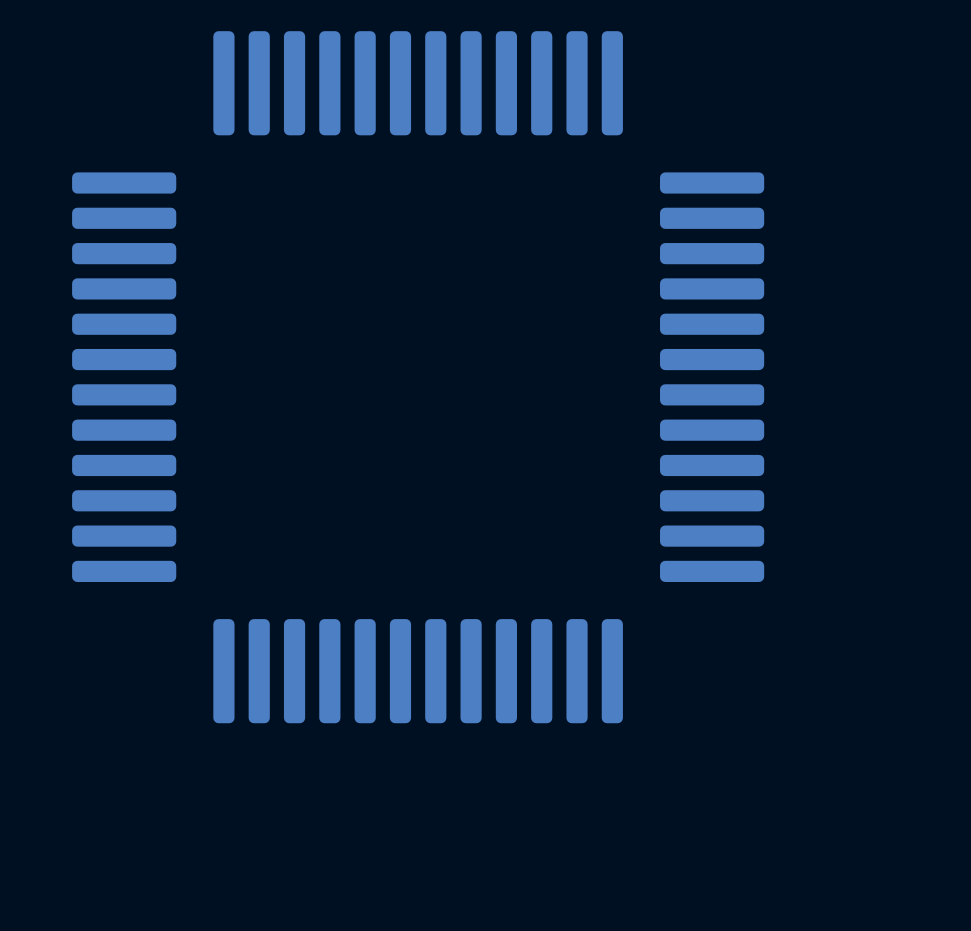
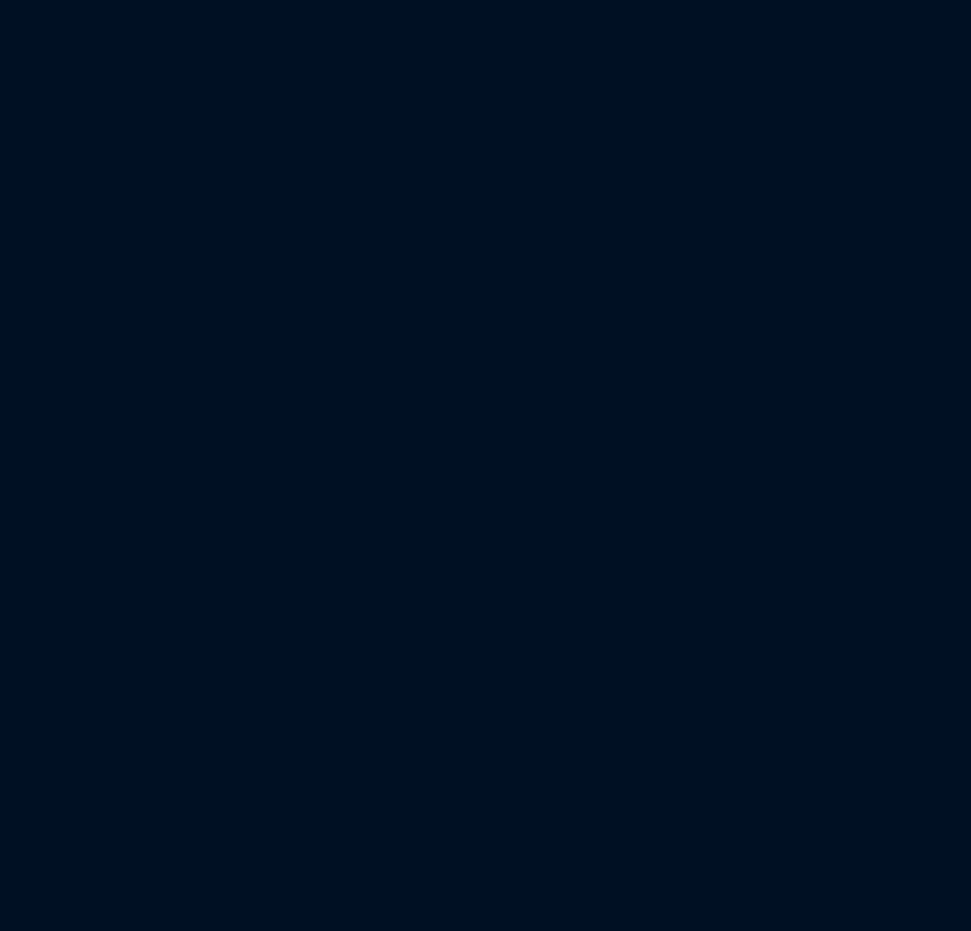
part: (418, 377) -> none

